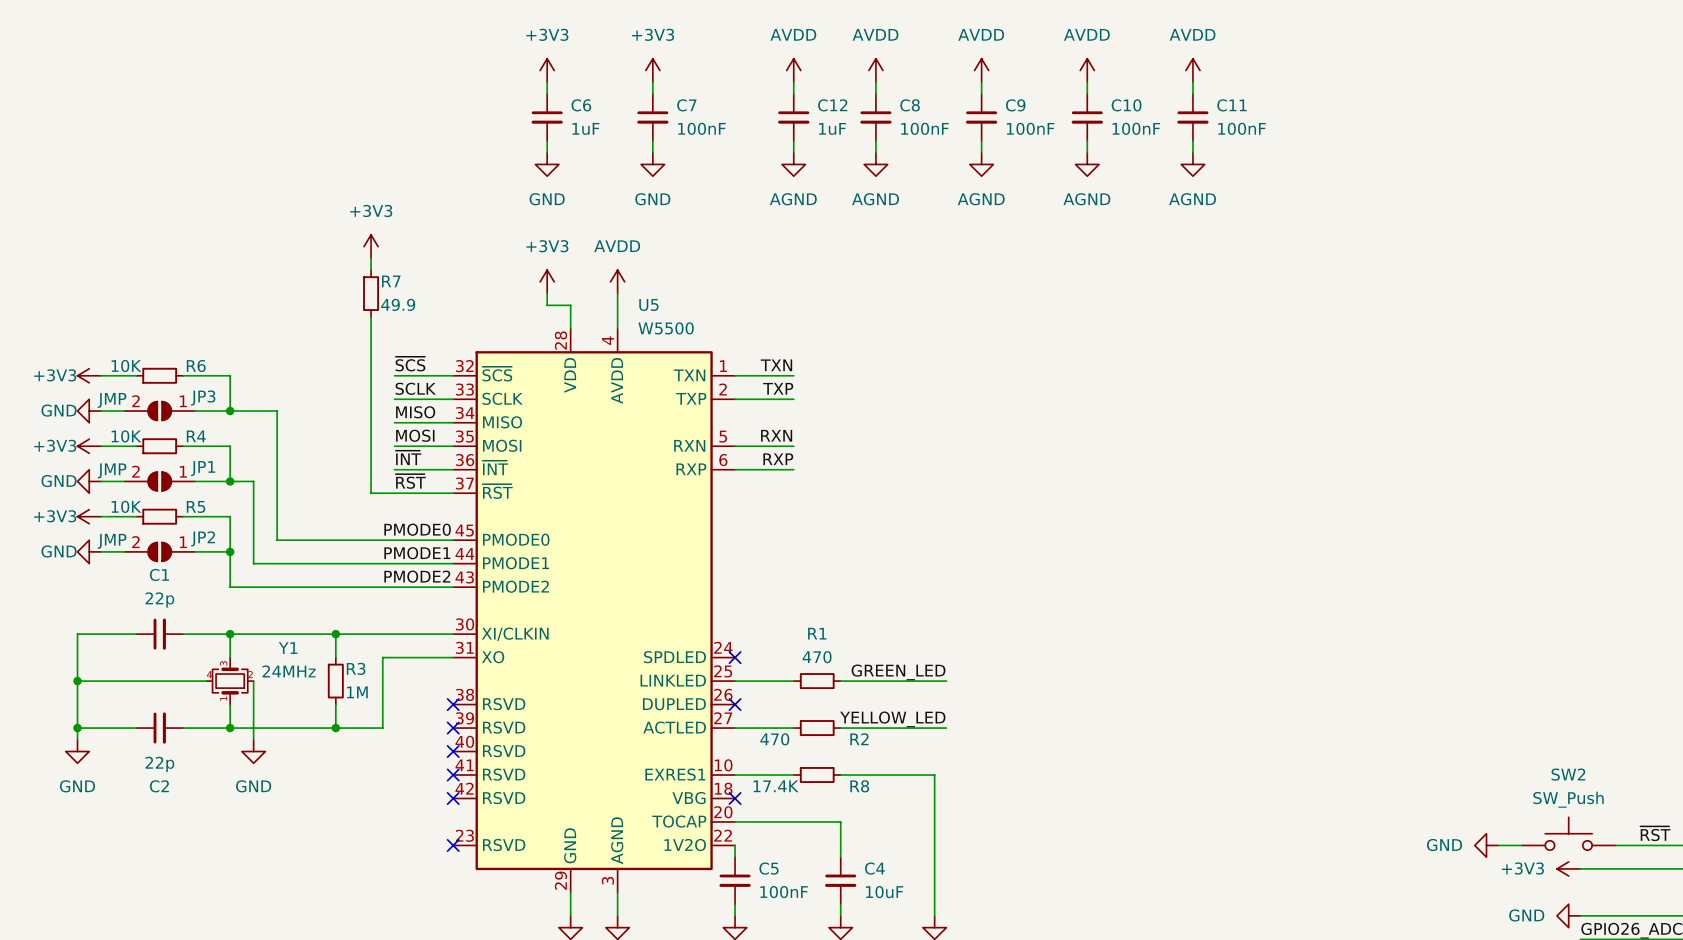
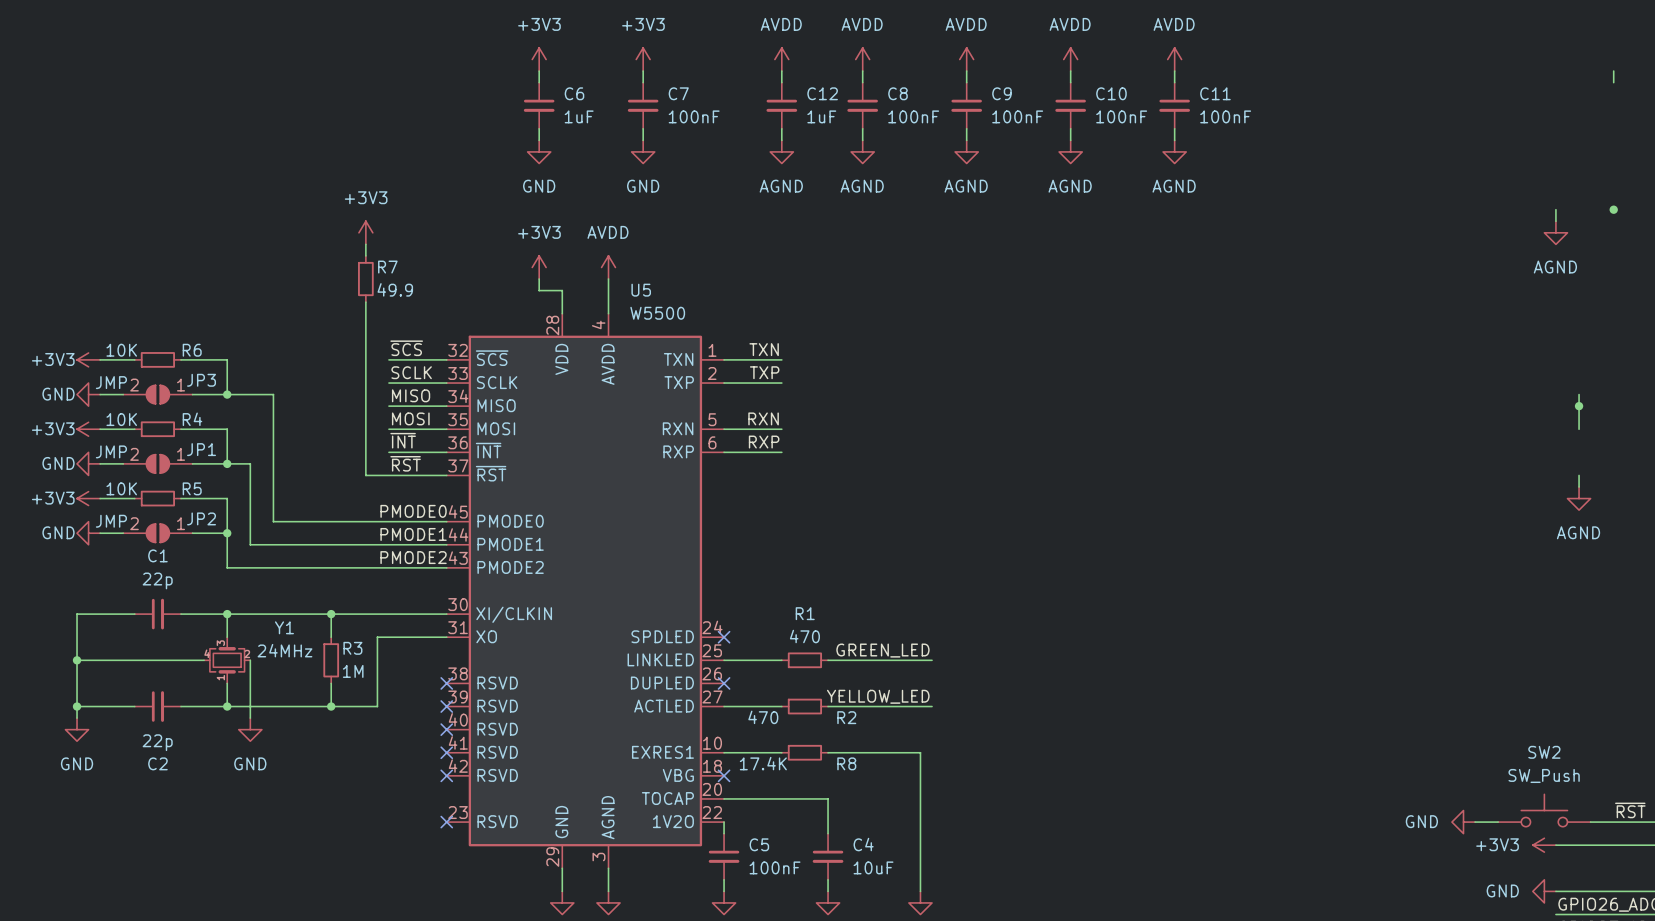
wire: none -> (1613, 71) (1613, 82)
wire: none -> (1555, 209) (1555, 221)
junction: none -> (1613, 209)
power symbol: none -> AGND (1555, 232)
wire: none -> (1579, 394) (1579, 429)
junction: none -> (1579, 406)
wire: none -> (1579, 475) (1579, 487)
power symbol: none -> AGND (1579, 498)

